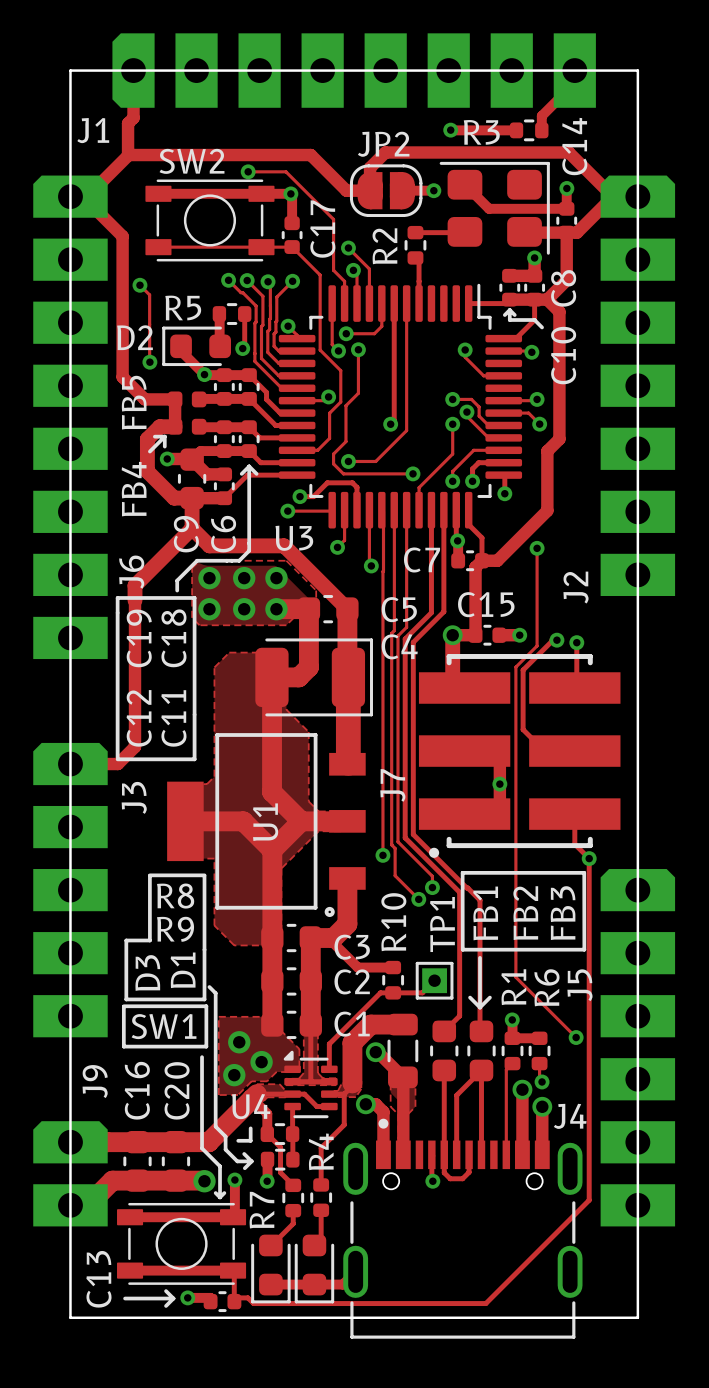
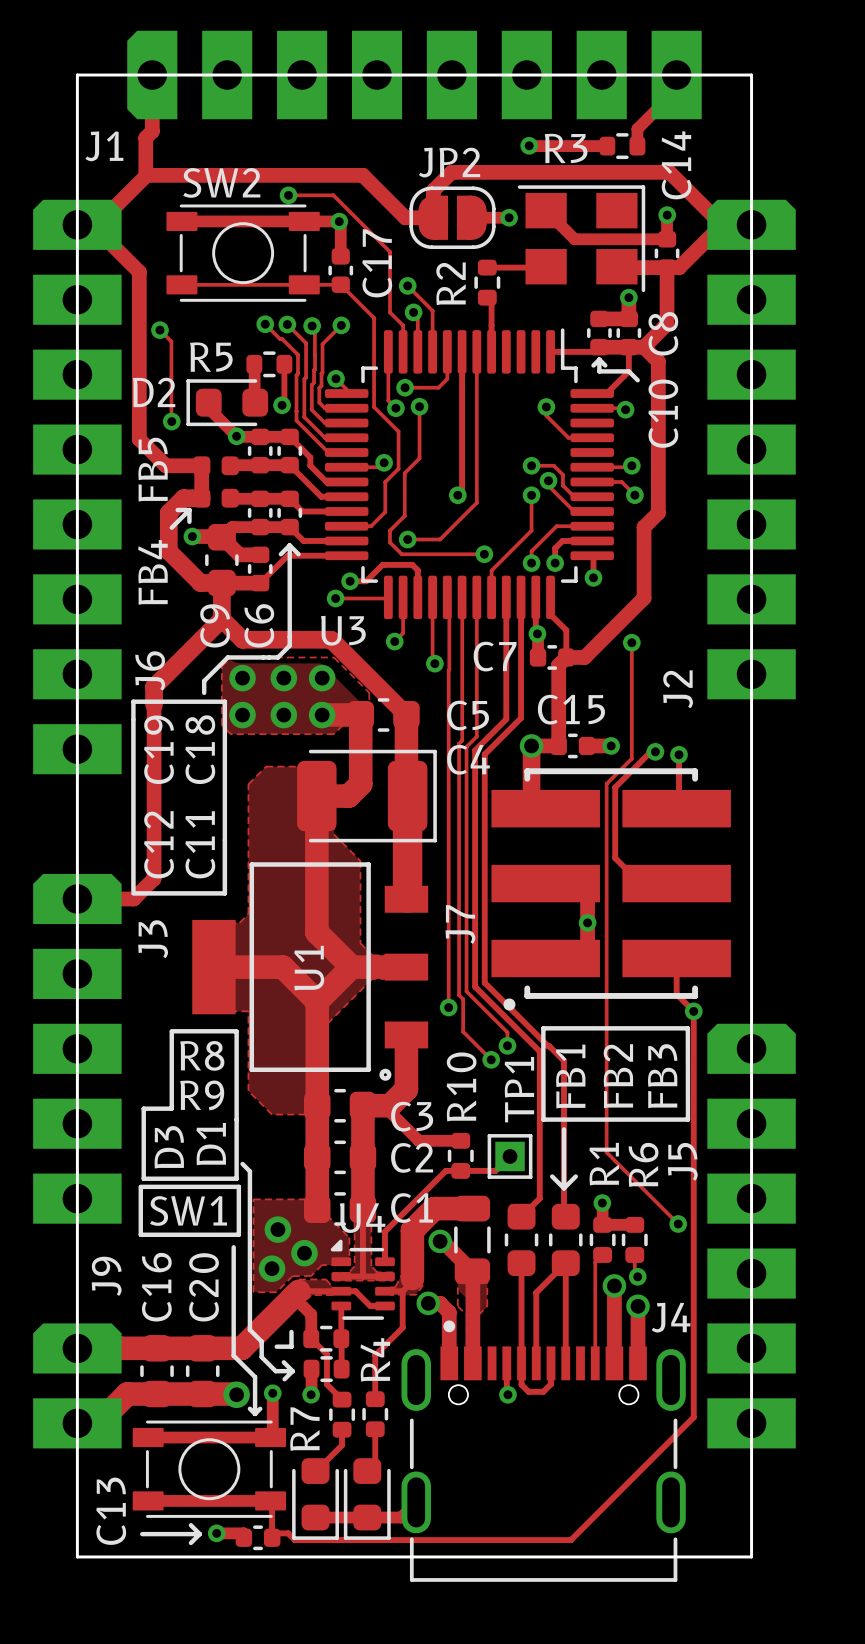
part footprint: [439, 161, 550, 255] -> [517, 185, 646, 293]
U4 name position: U4 (251, 1106) -> U4 (362, 1218)

